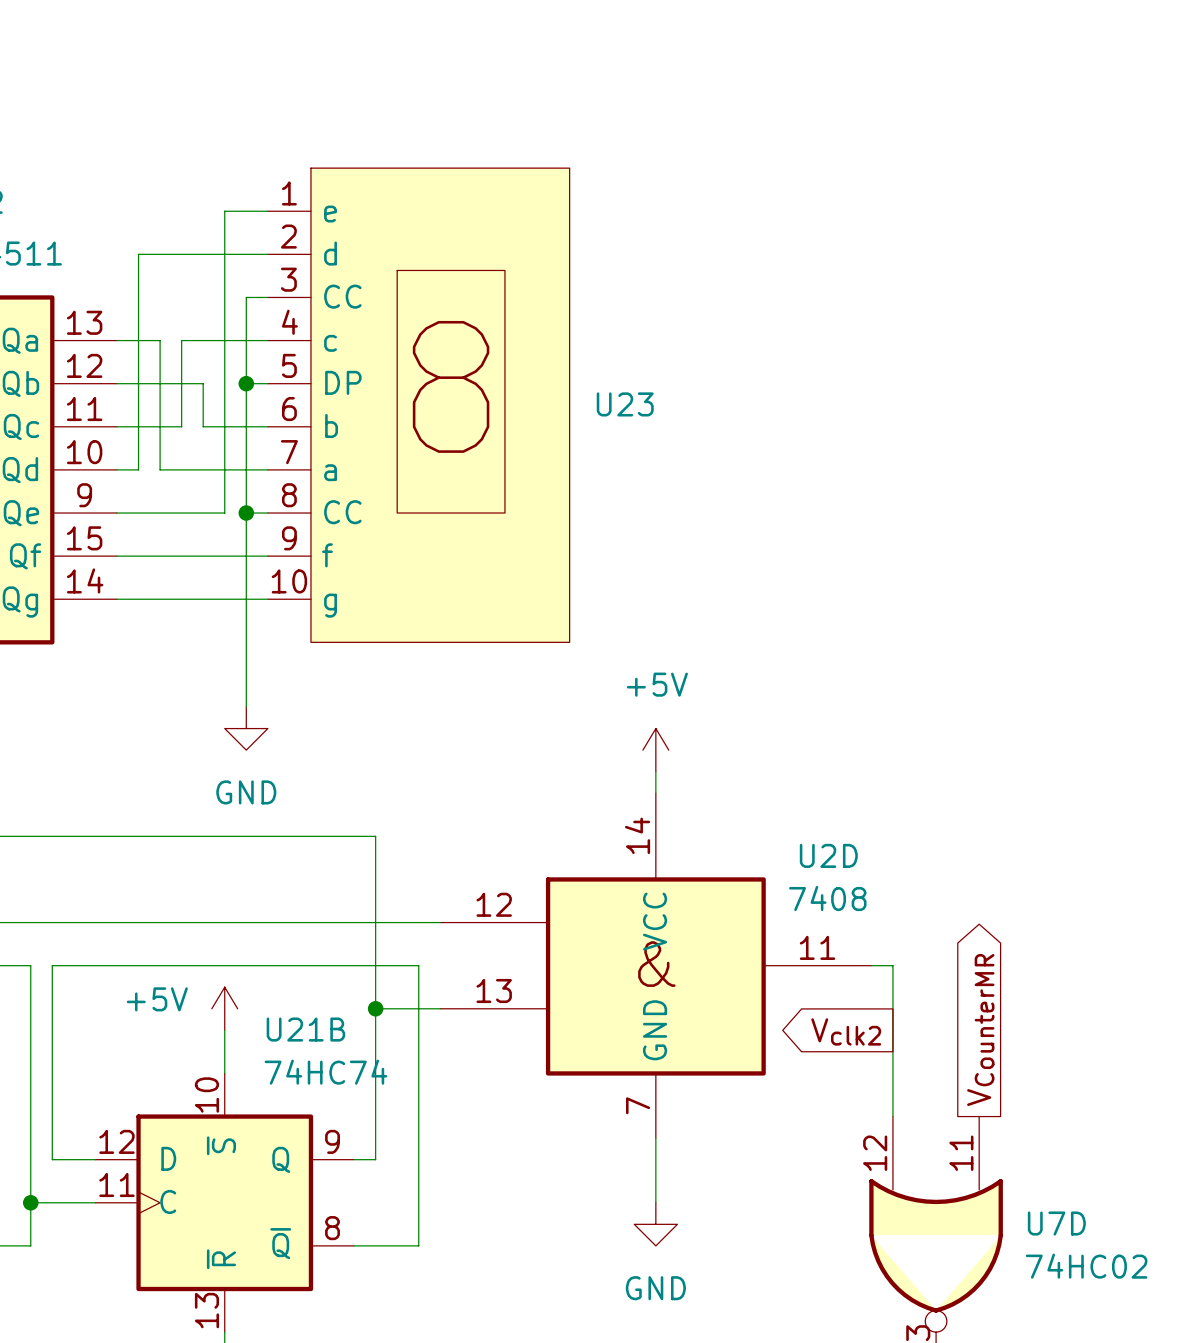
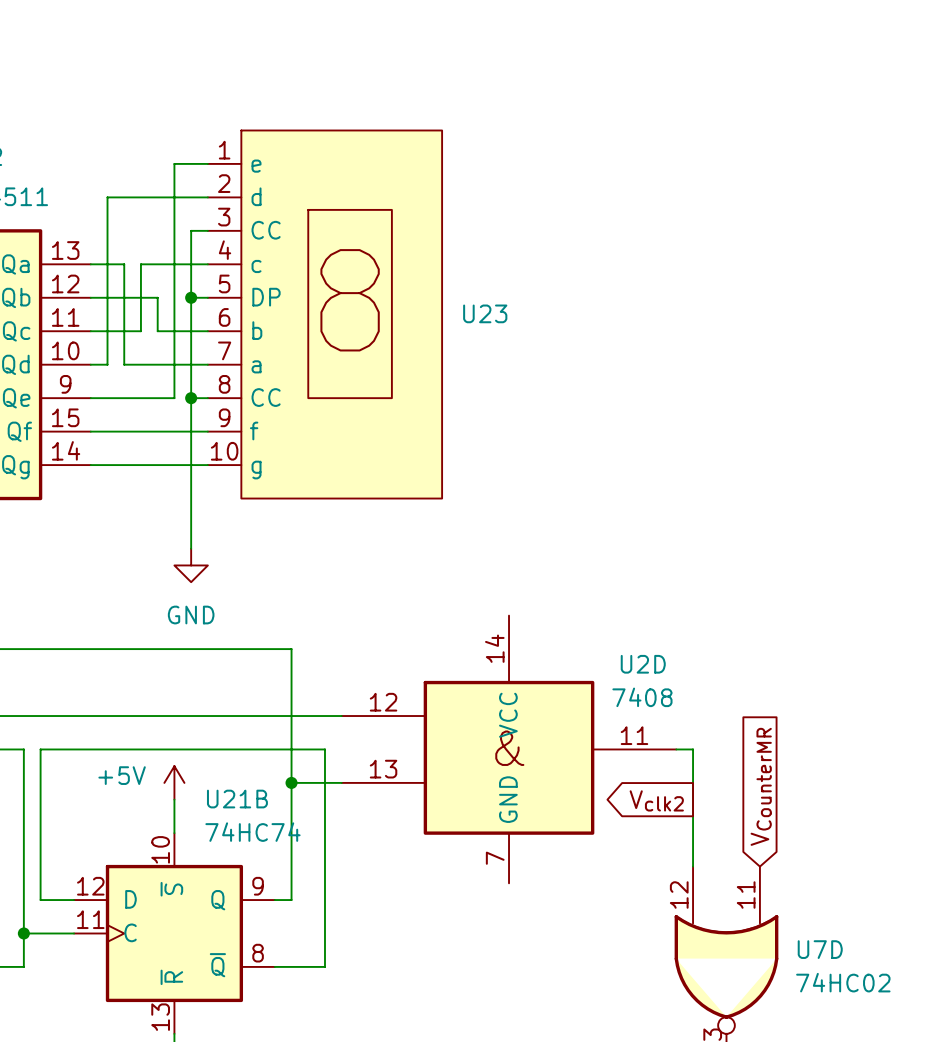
power symbol: +5V (655, 750) -> none
wire: (655, 771) (655, 793) -> none
global label shape: output (980, 1030) -> input (761, 786)
wire: (655, 1138) (655, 1202) -> none
power symbol: GND (655, 1224) -> none

